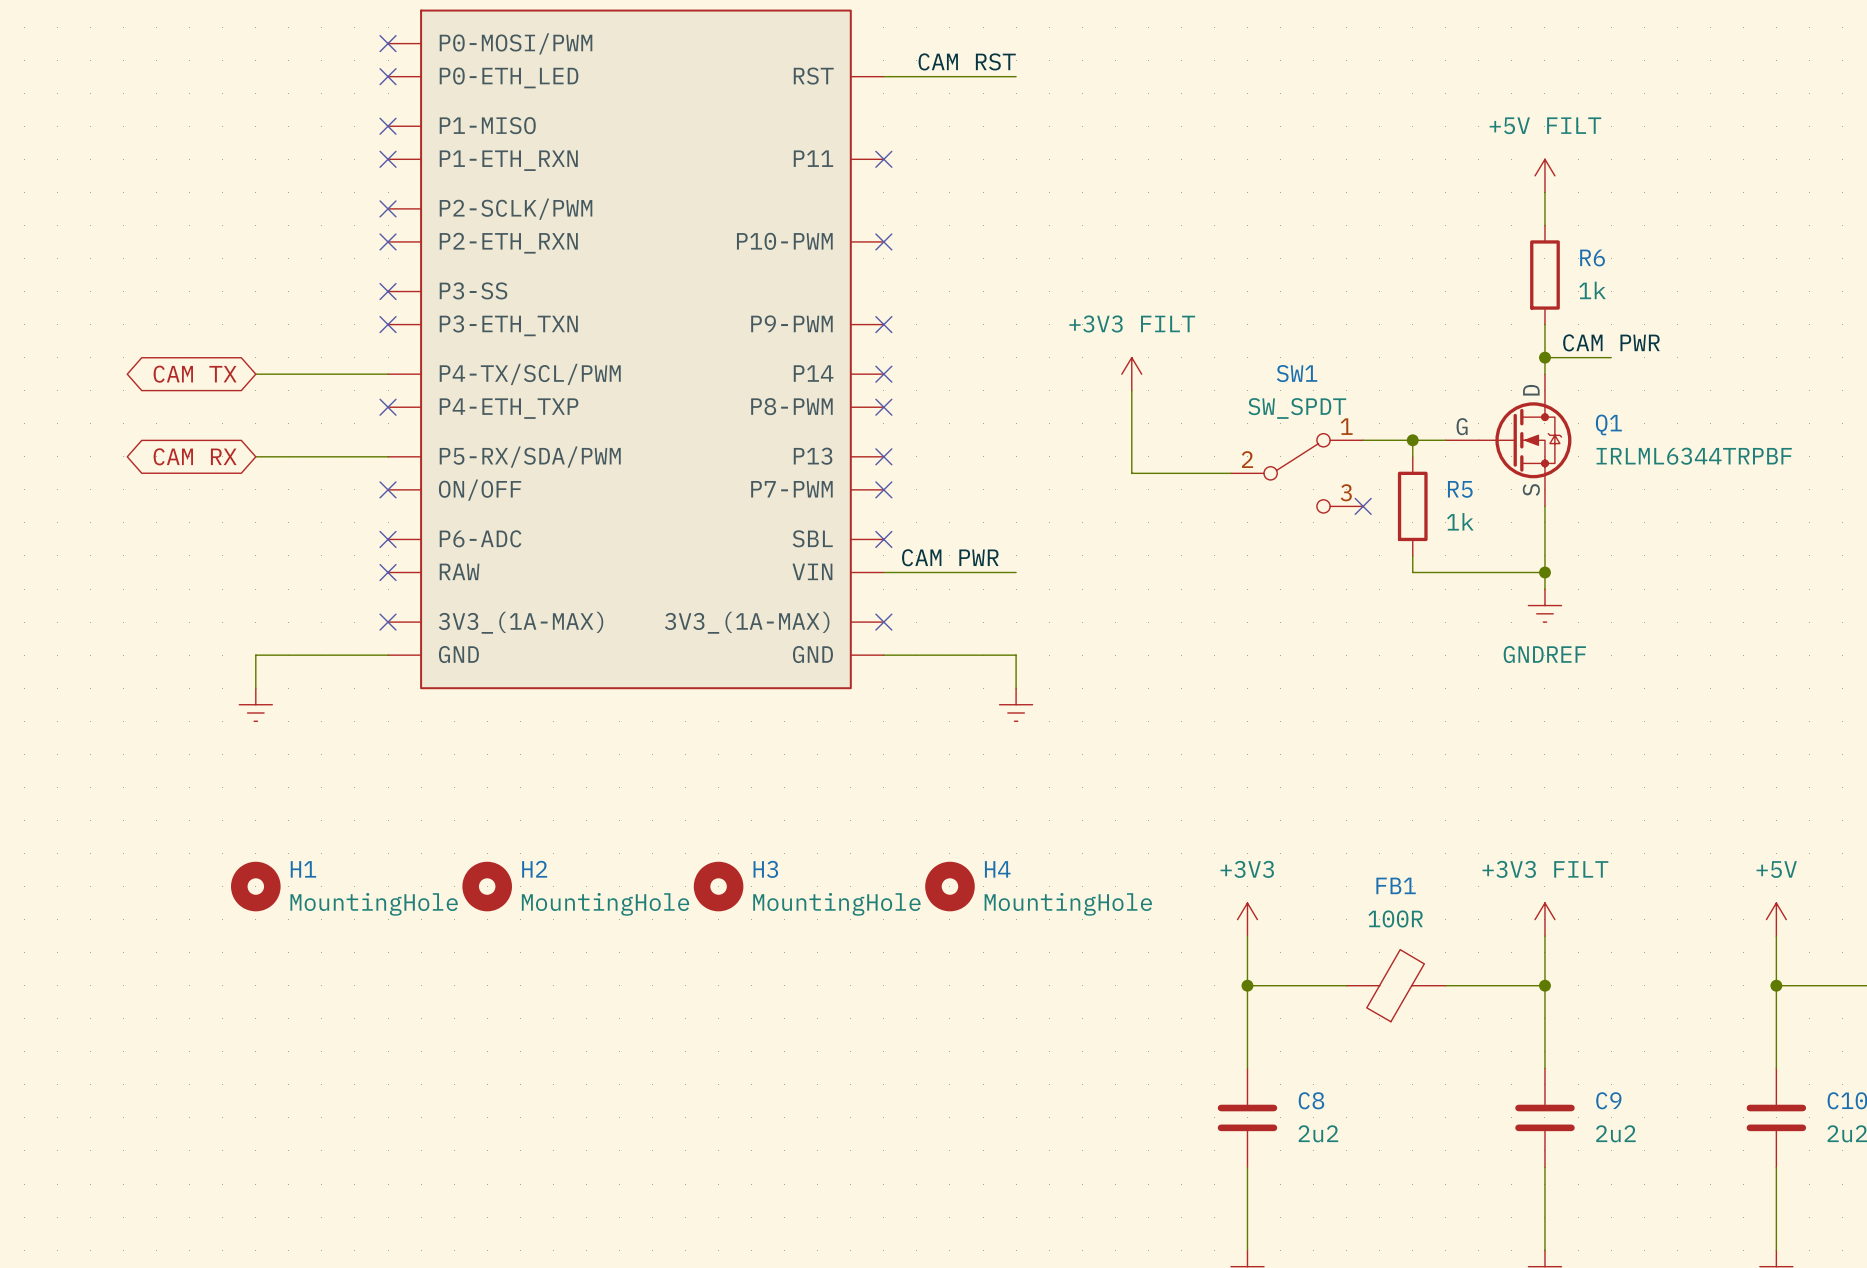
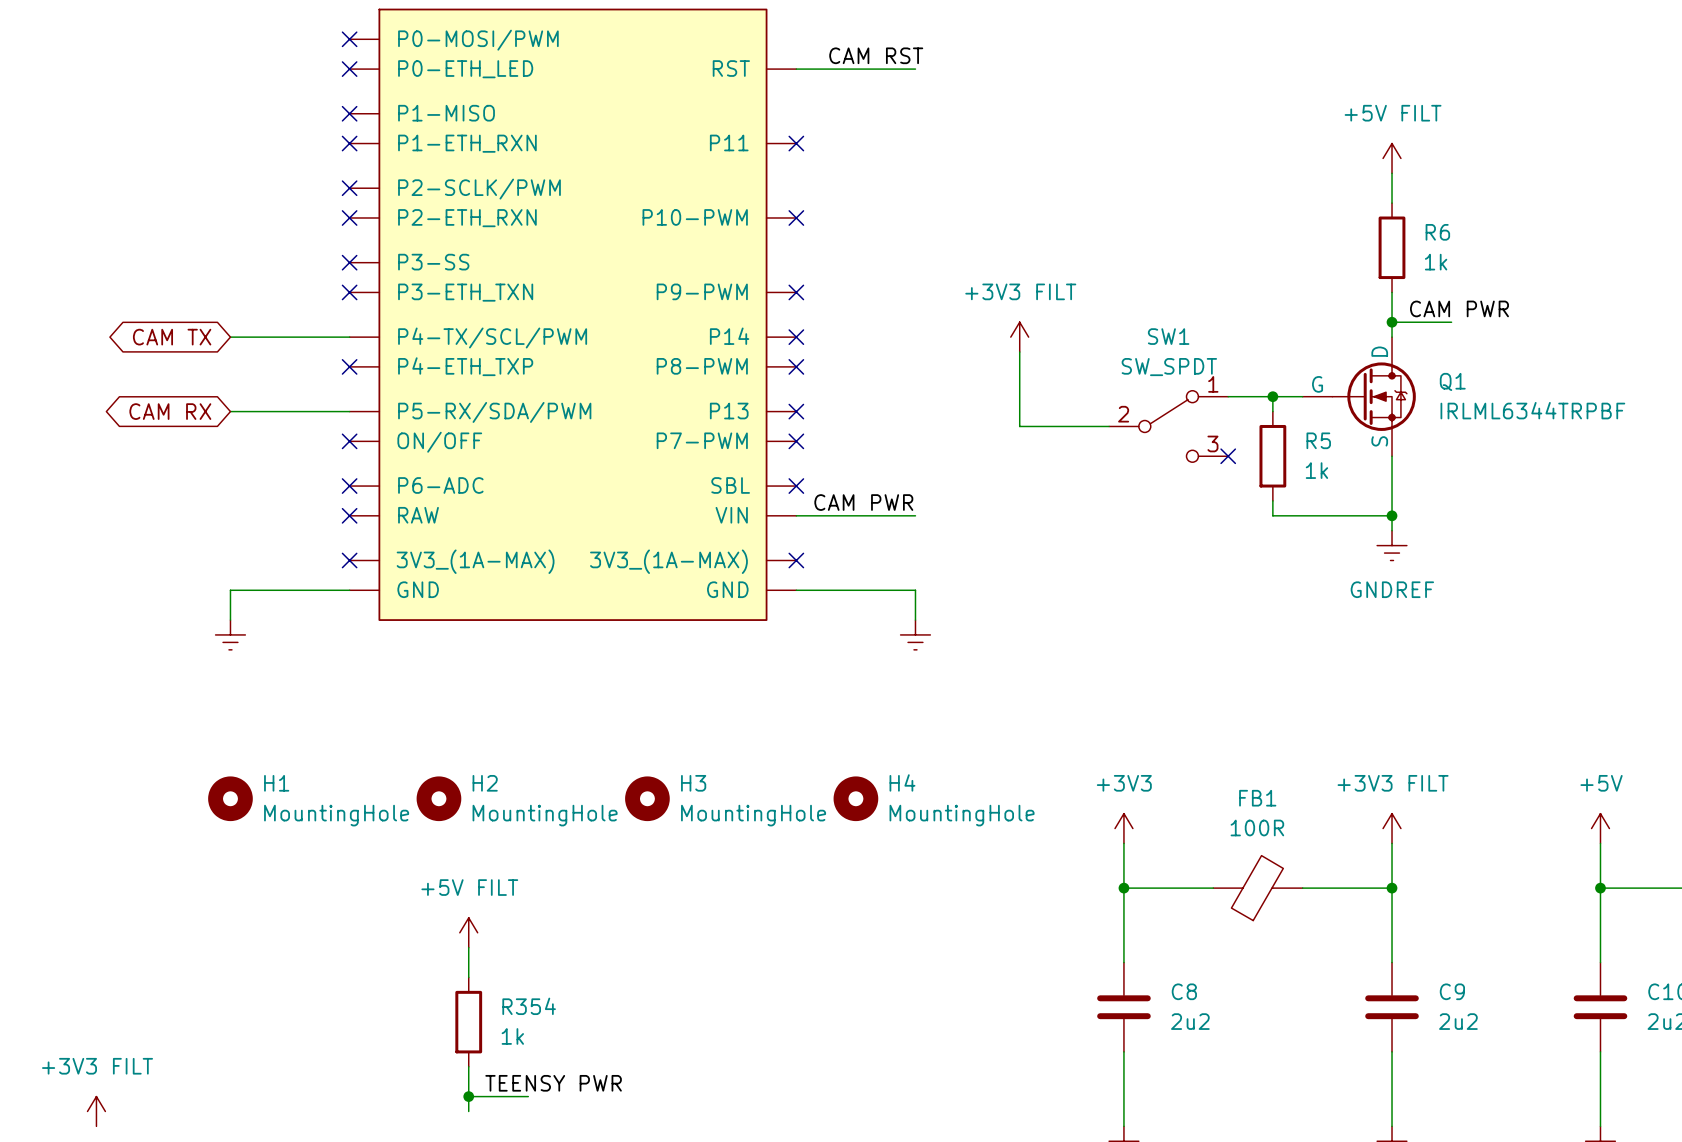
power symbol: none -> +5V FILT (468, 932)
wire: none -> (468, 947) (468, 977)
R354: none -> 1k (468, 1022)
wire: none -> (468, 1066) (468, 1111)
label: none -> TEENSY PWR (553, 1083)
wire: none -> (468, 1096) (528, 1096)
junction: none -> (468, 1096)
power symbol: none -> +3V3 FILT (96, 1111)

